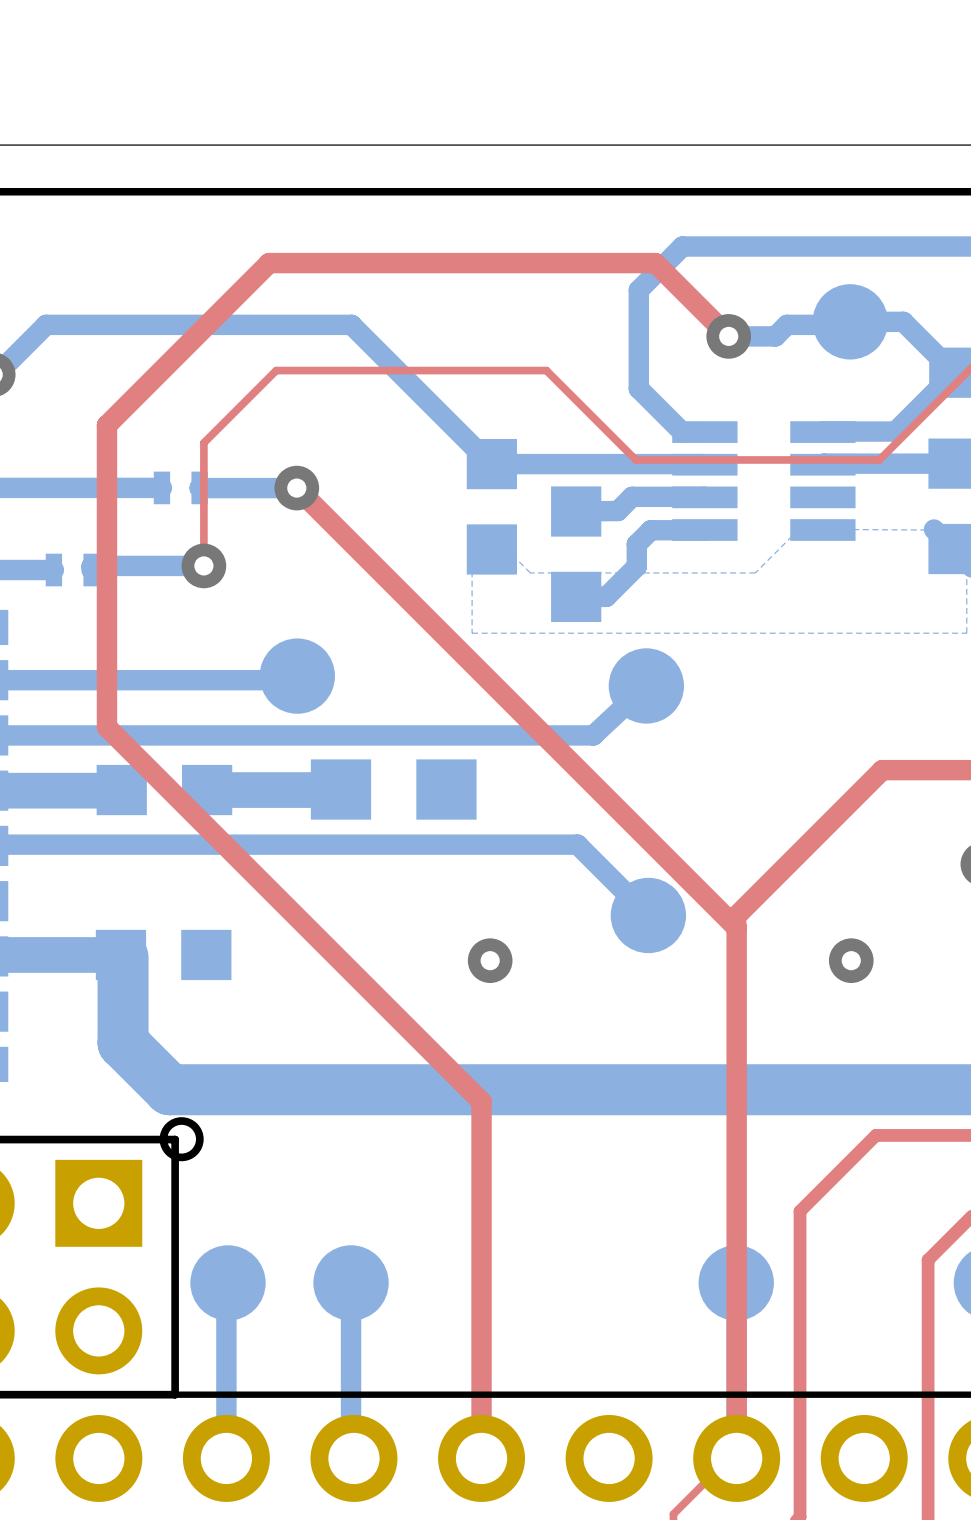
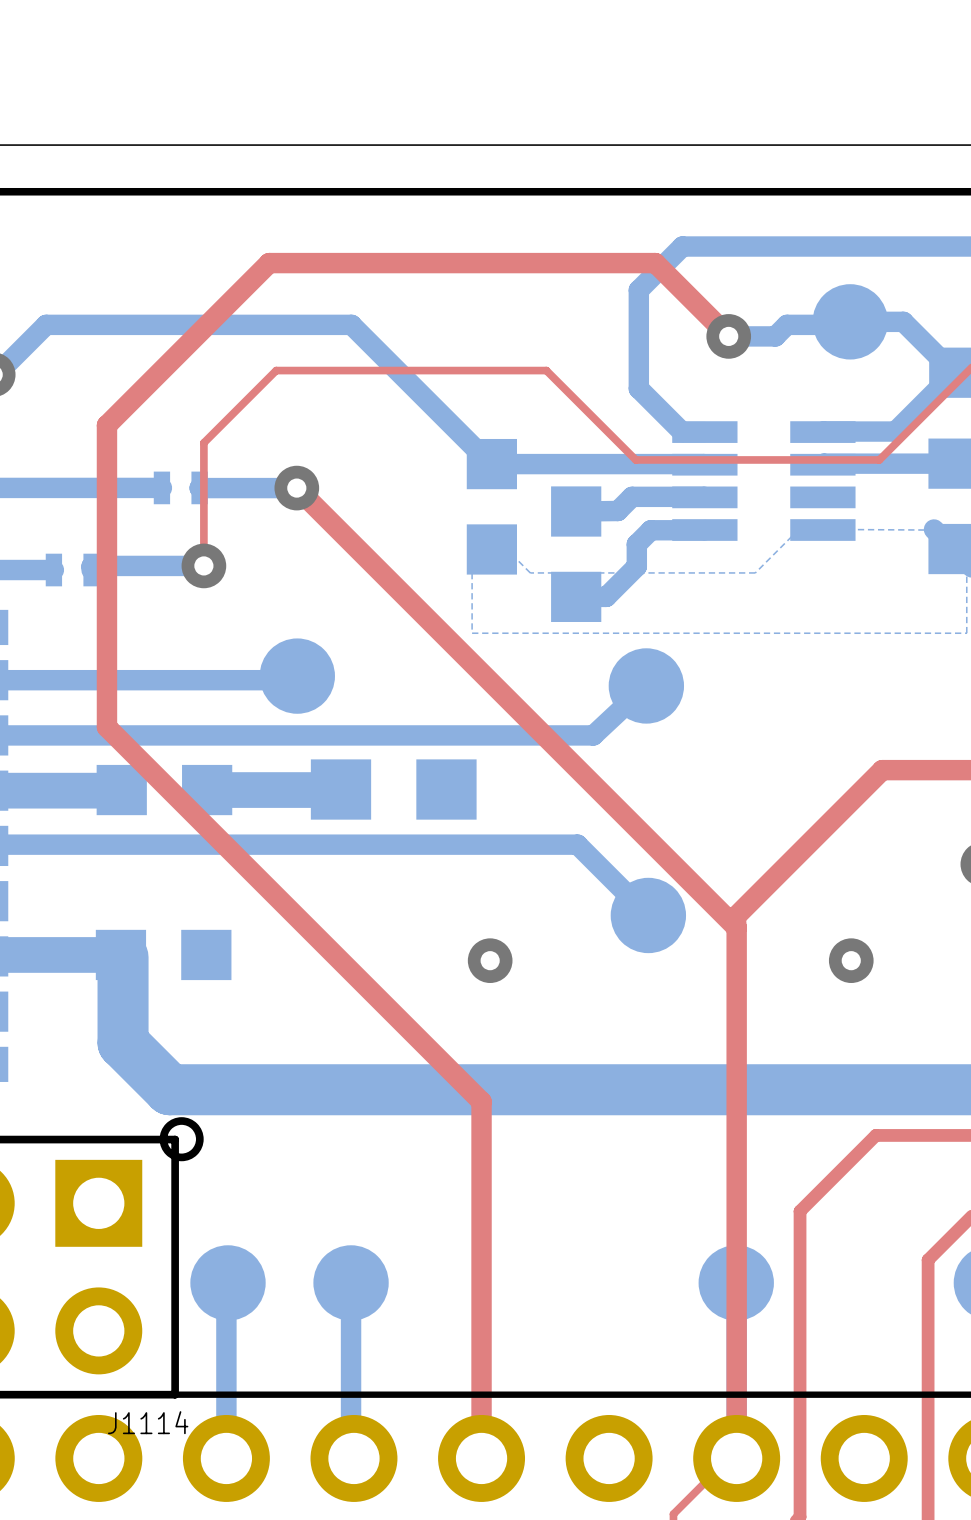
J1114 name: none -> J1114 (148, 1422)

